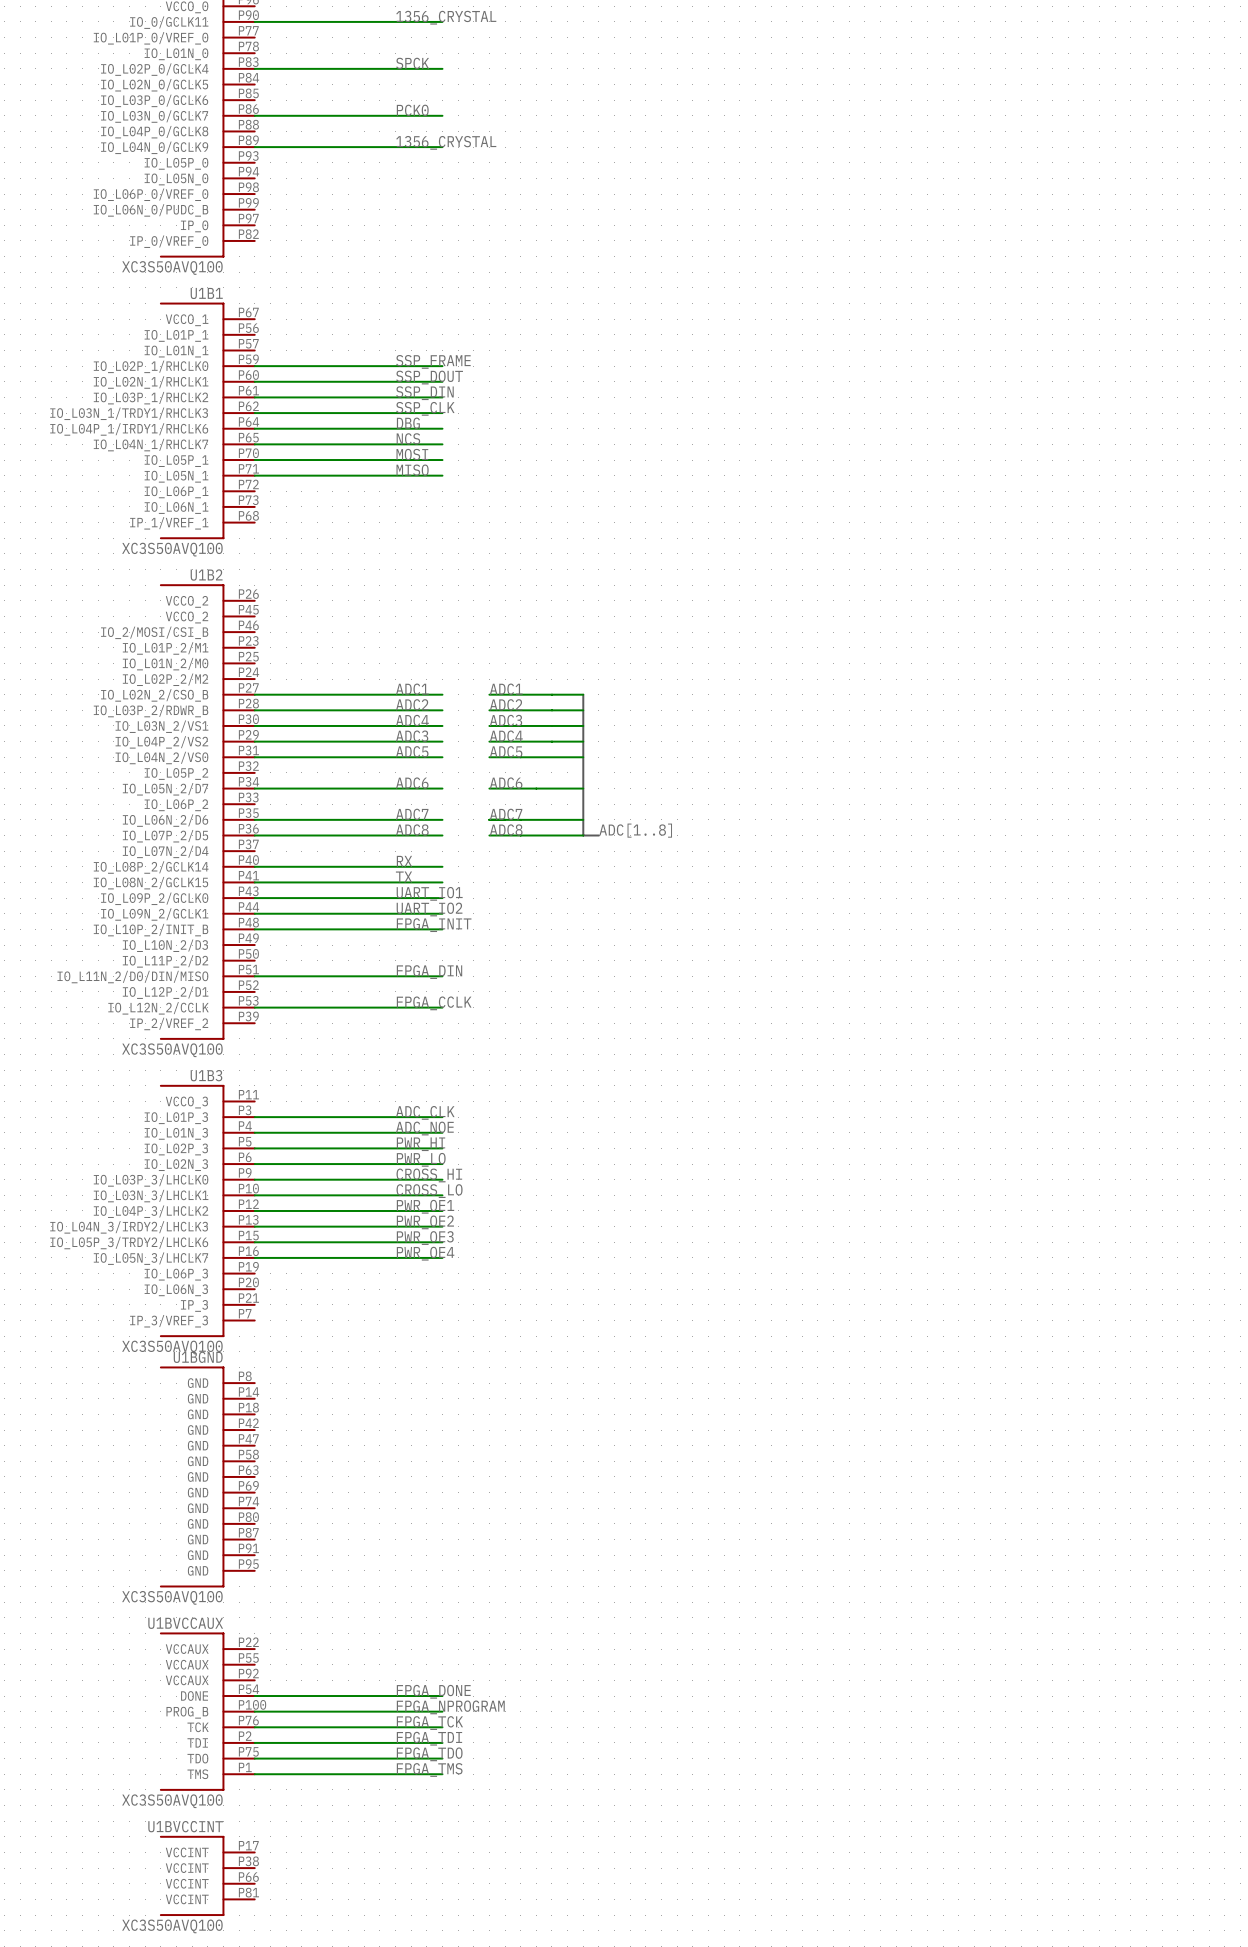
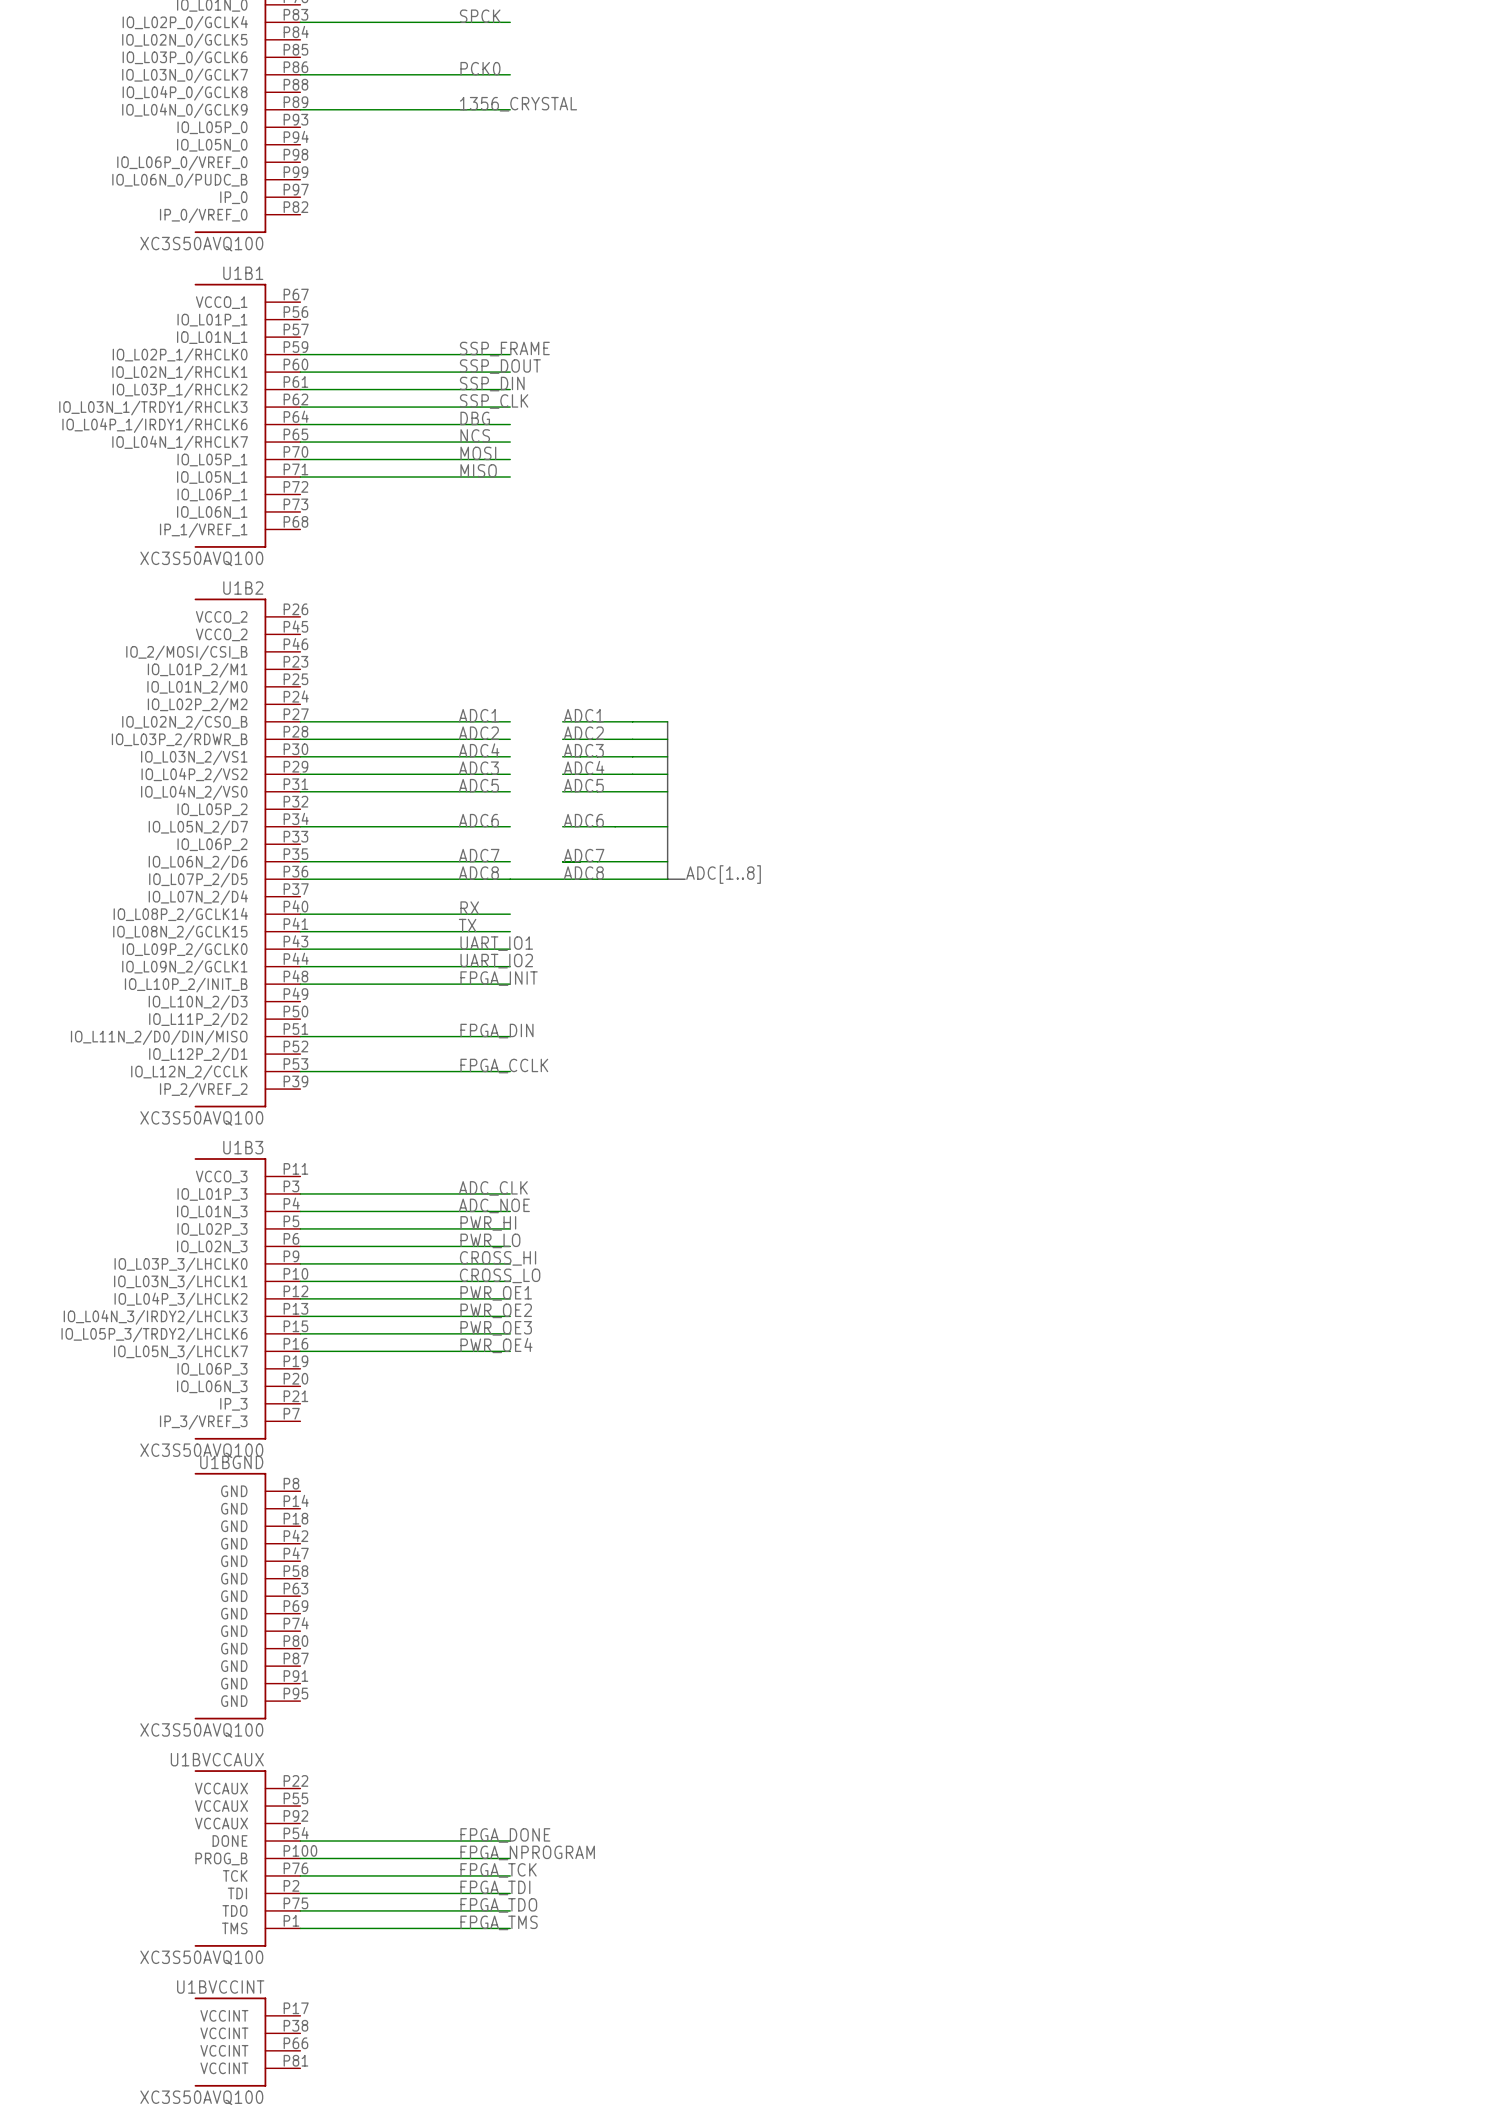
wire: none -> (510, 879) (562, 879)

